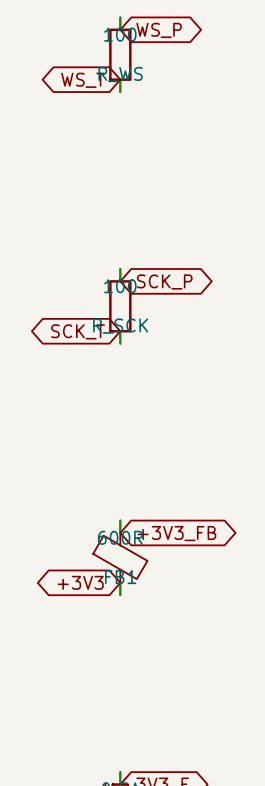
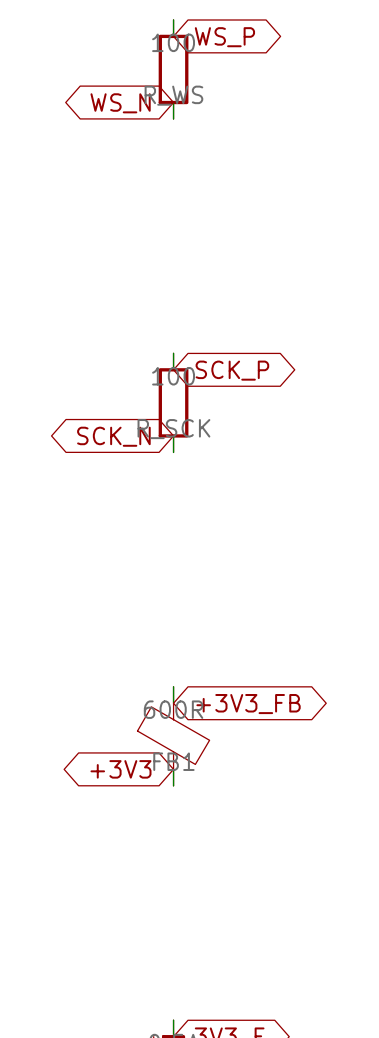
global label: WS_T (83, 80) -> WS_N (120, 103)
global label: SCK_T (78, 331) -> SCK_N (113, 436)

